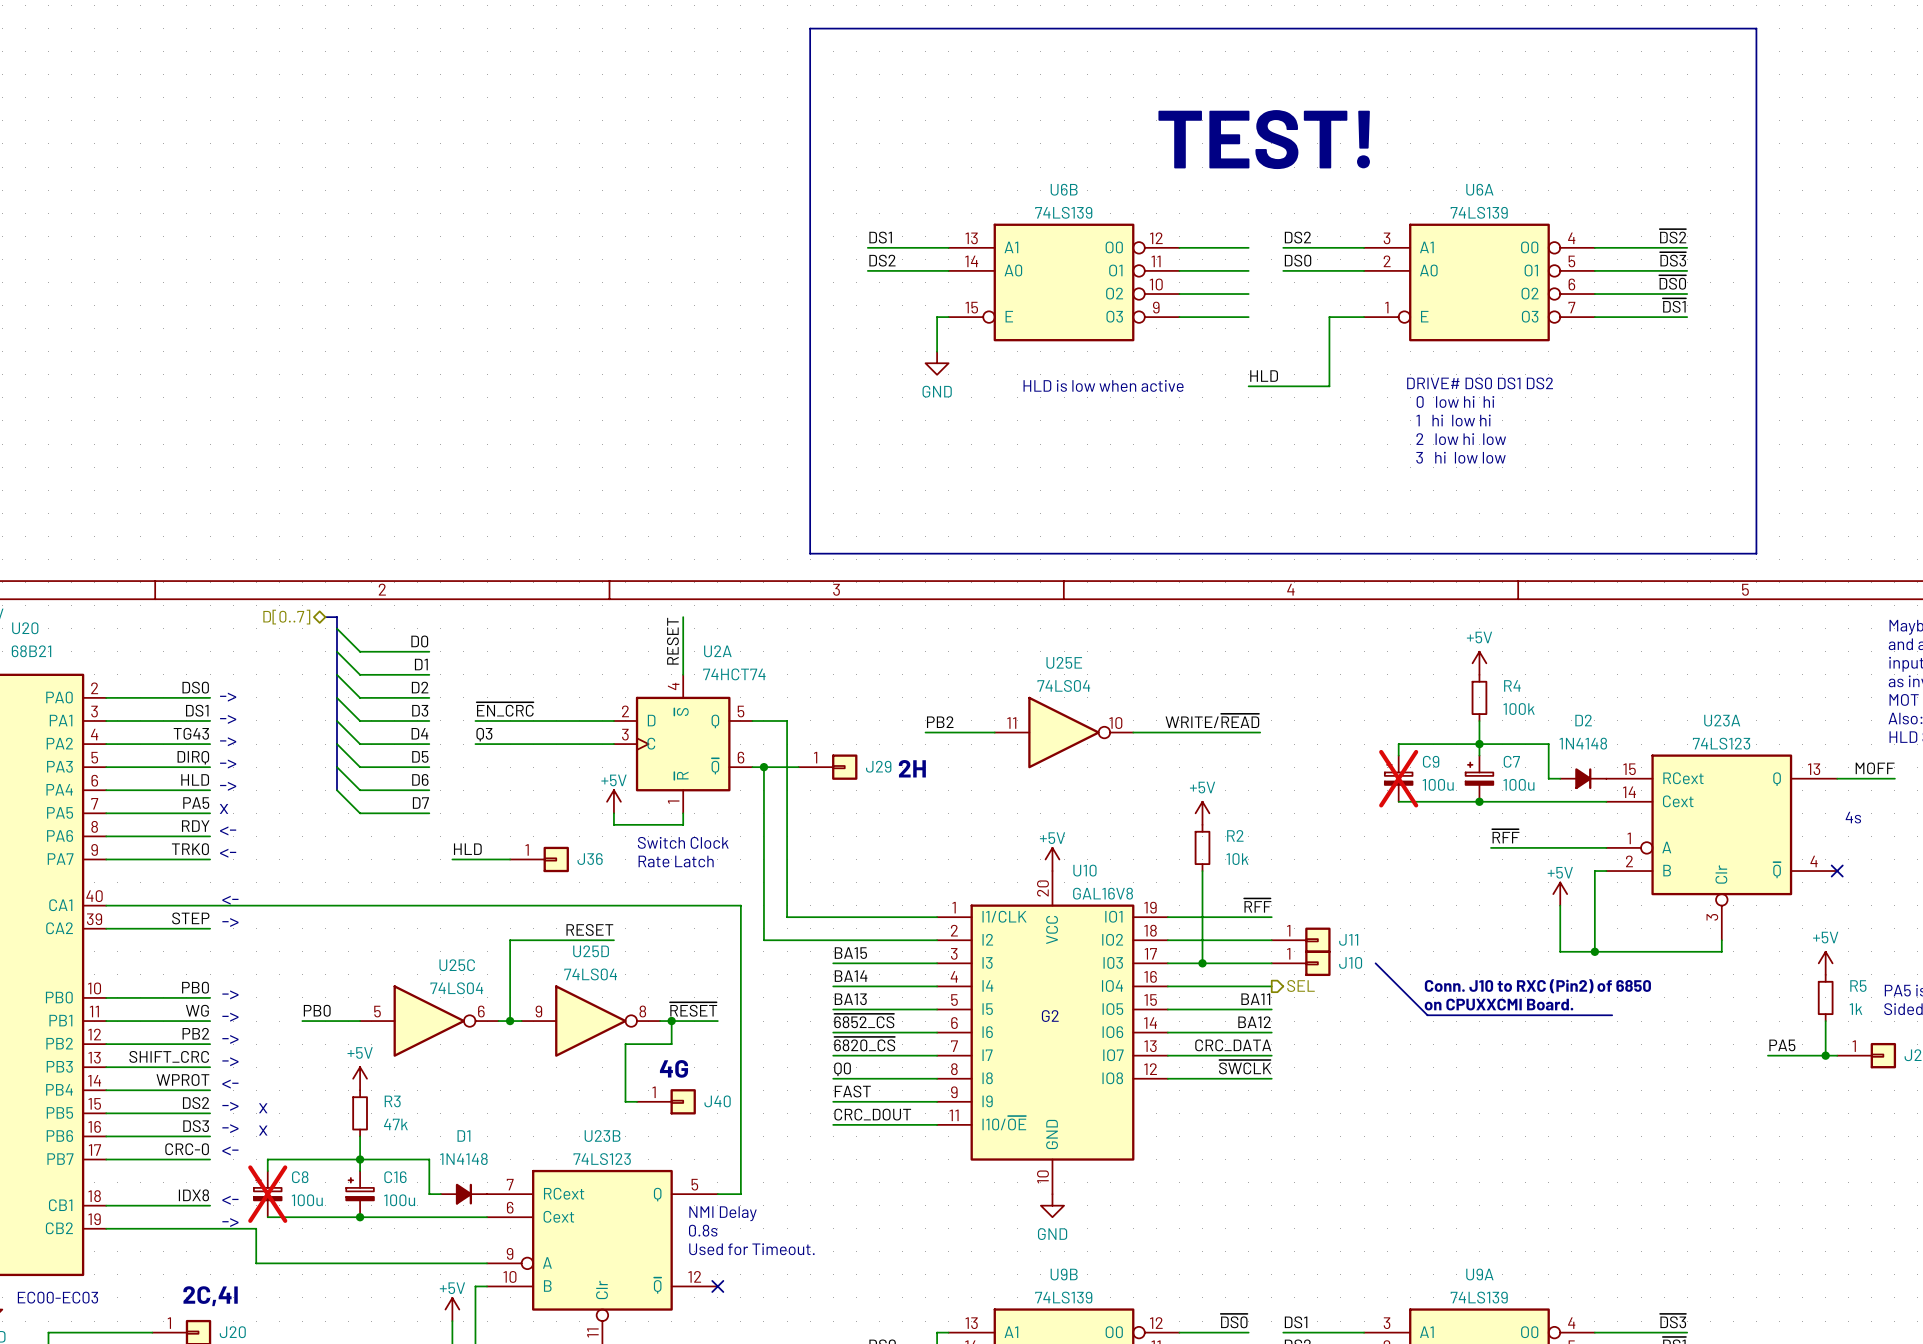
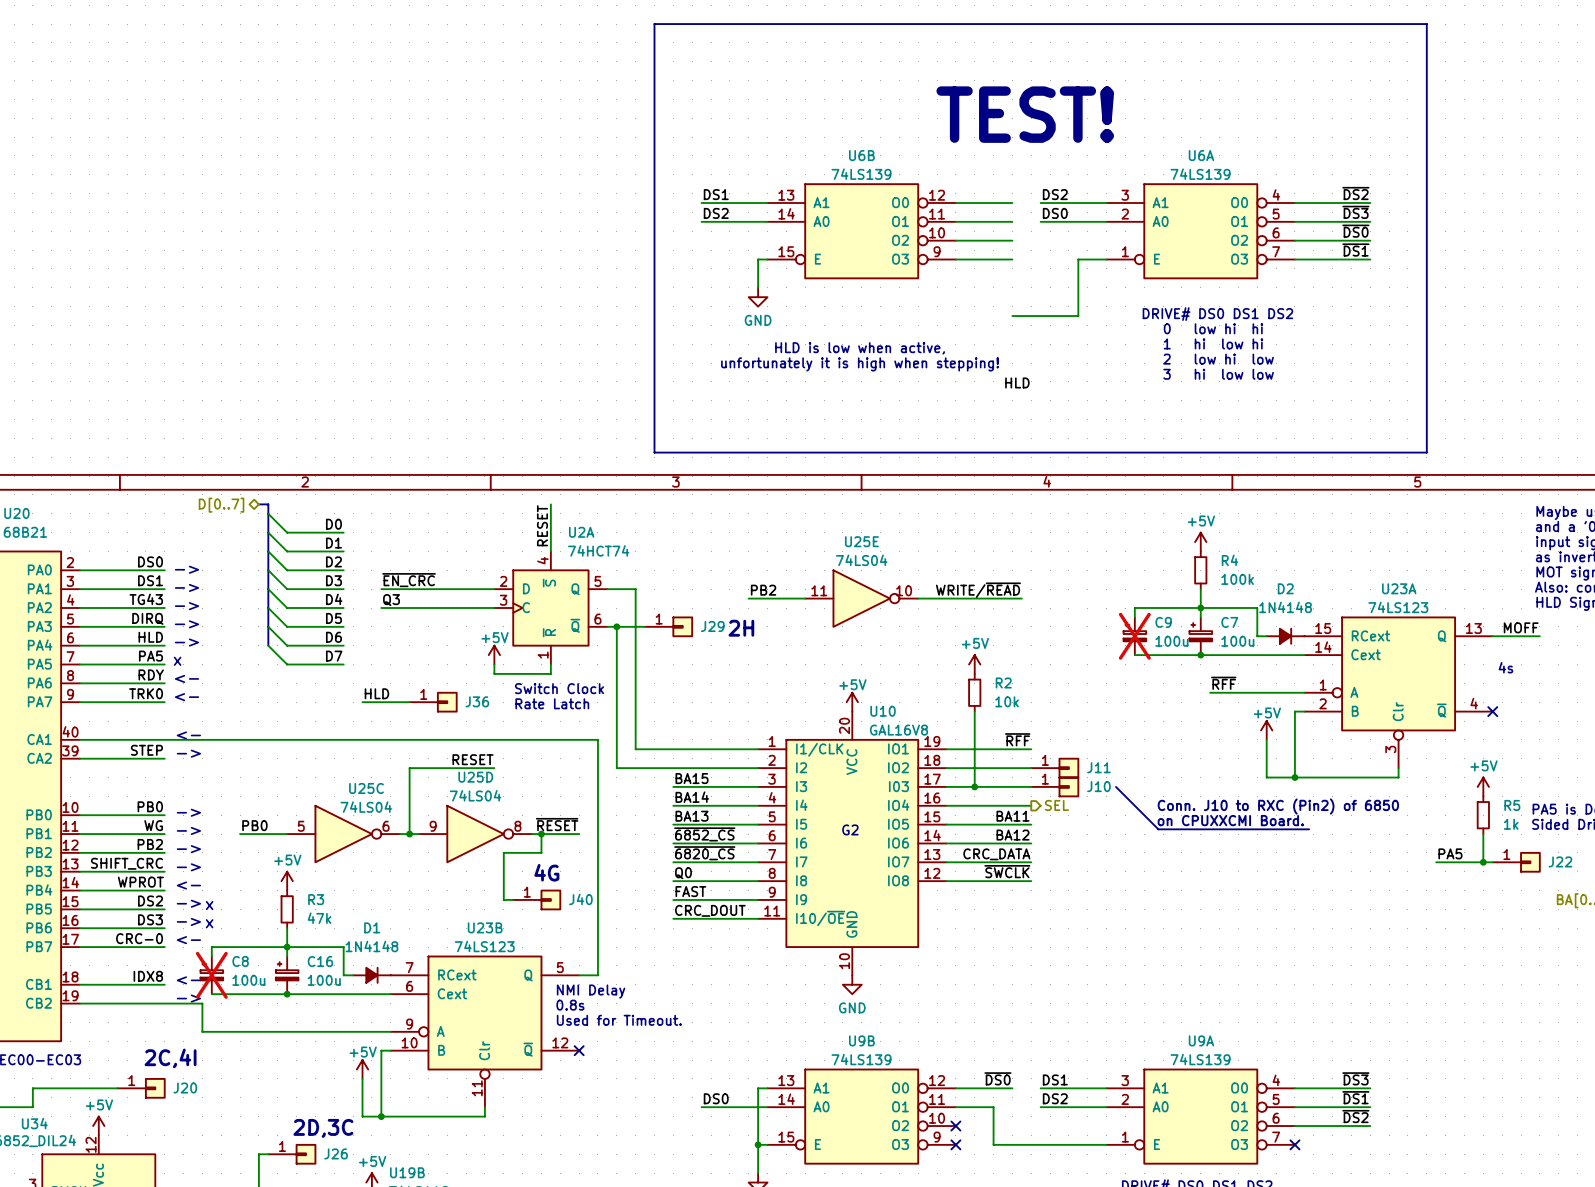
label position: HLD (1264, 376) -> HLD (1017, 382)
text: HLD is low when active (1103, 385) -> none
text: none -> HLD is low when active, (860, 348)
text: none -> unfortunately it is high when stepping! (860, 364)

